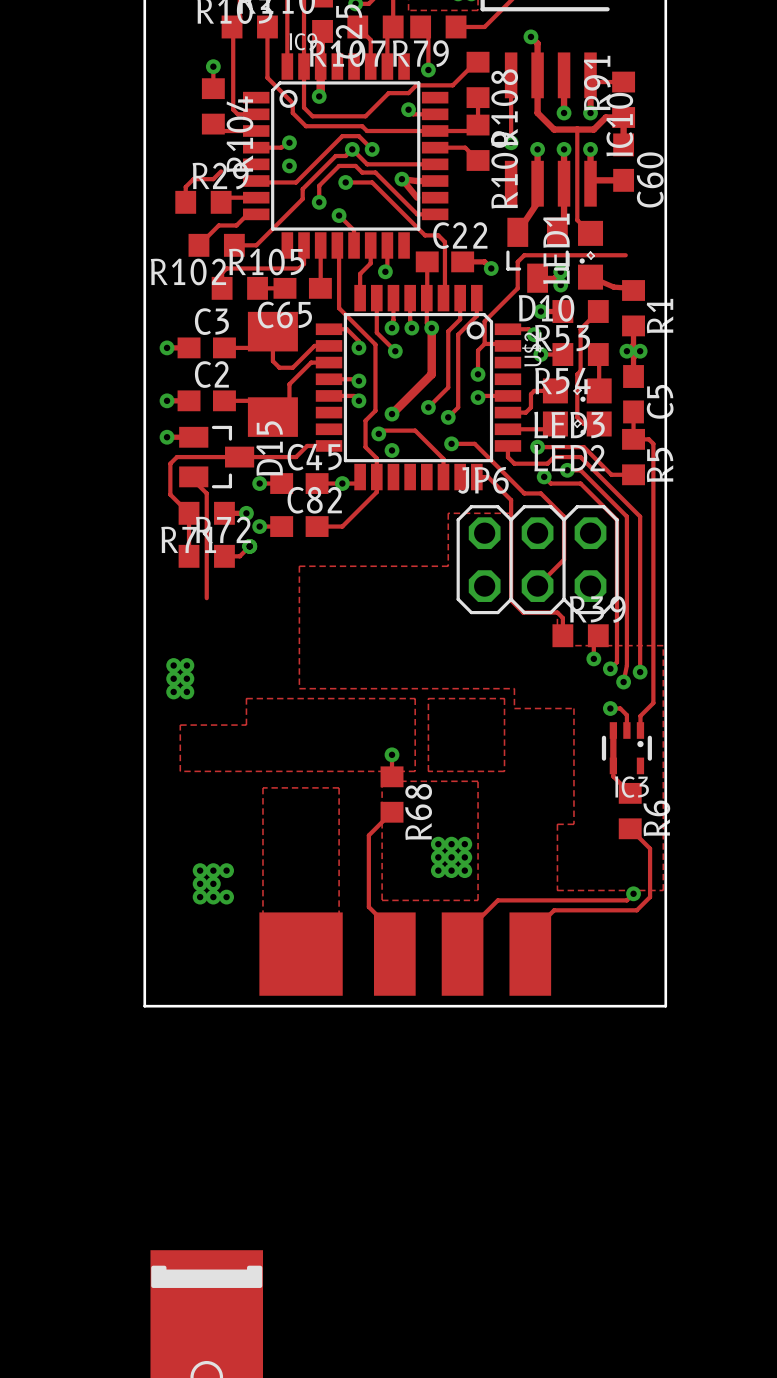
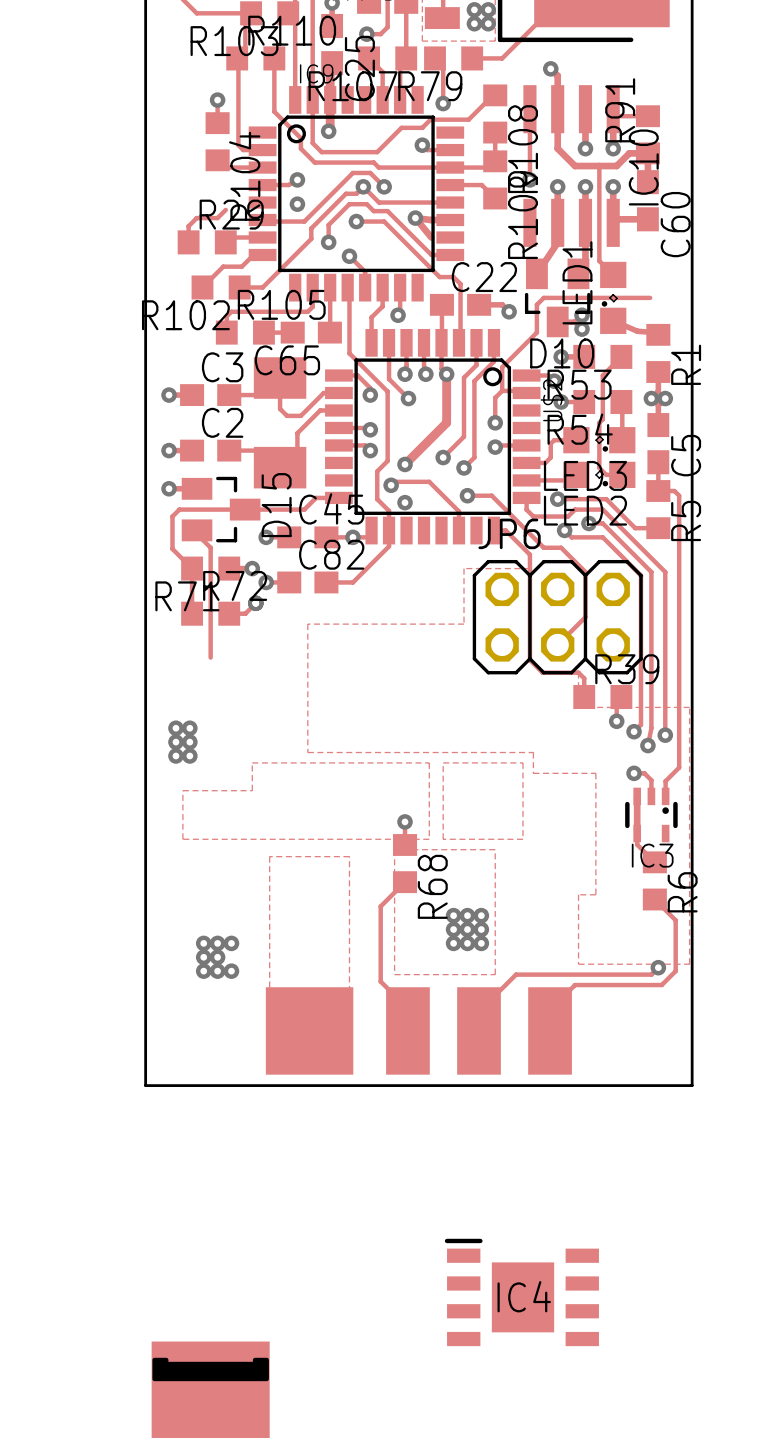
IC4: none -> (521, 1292)

